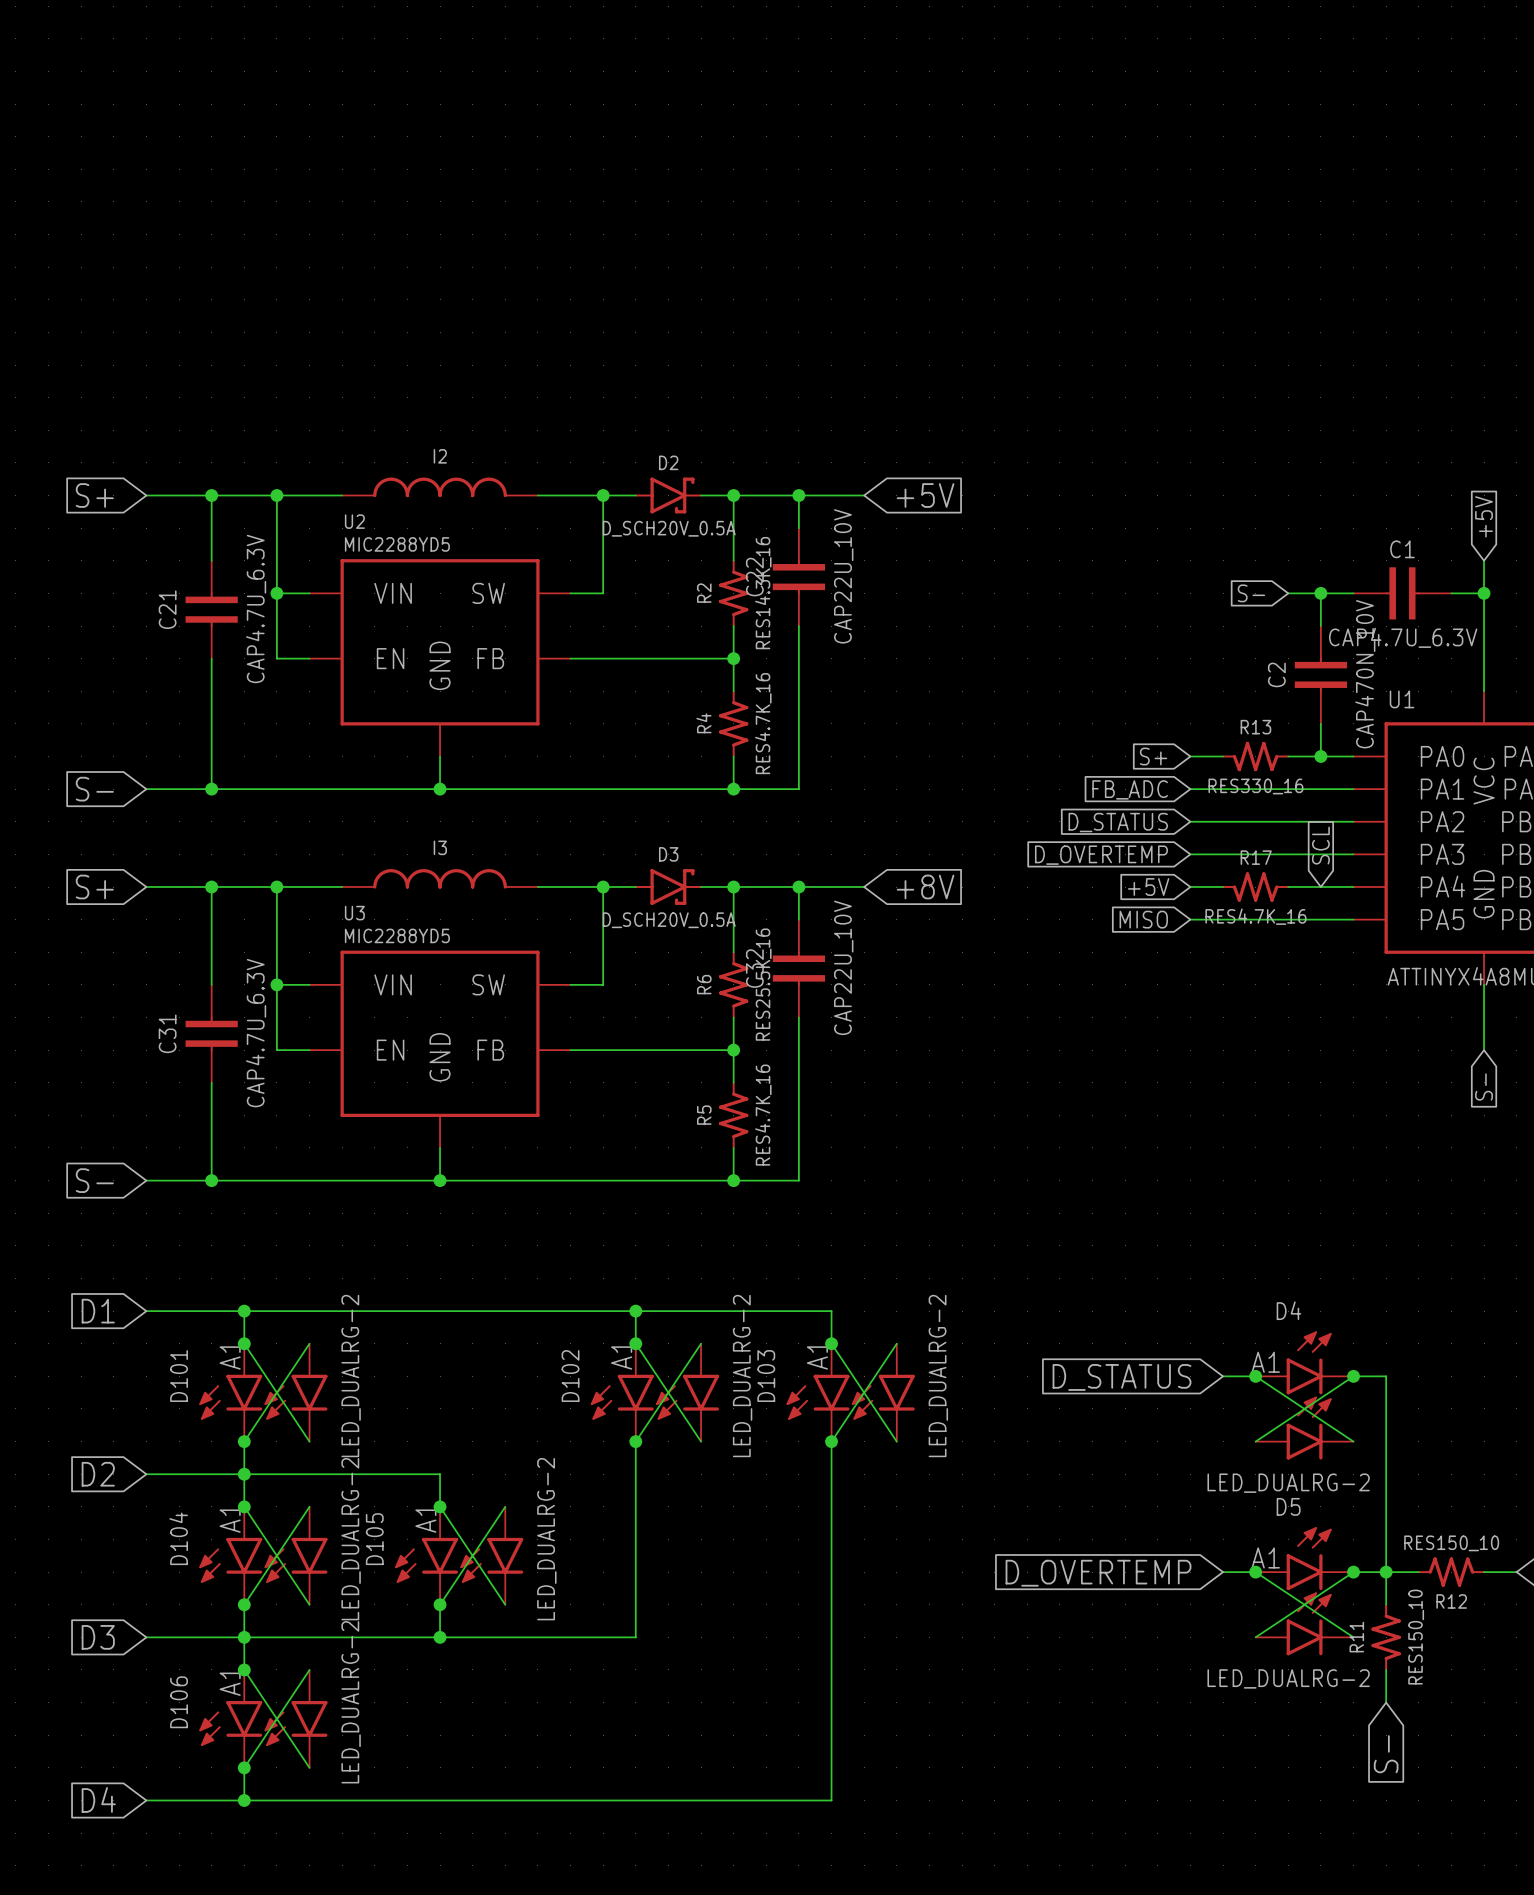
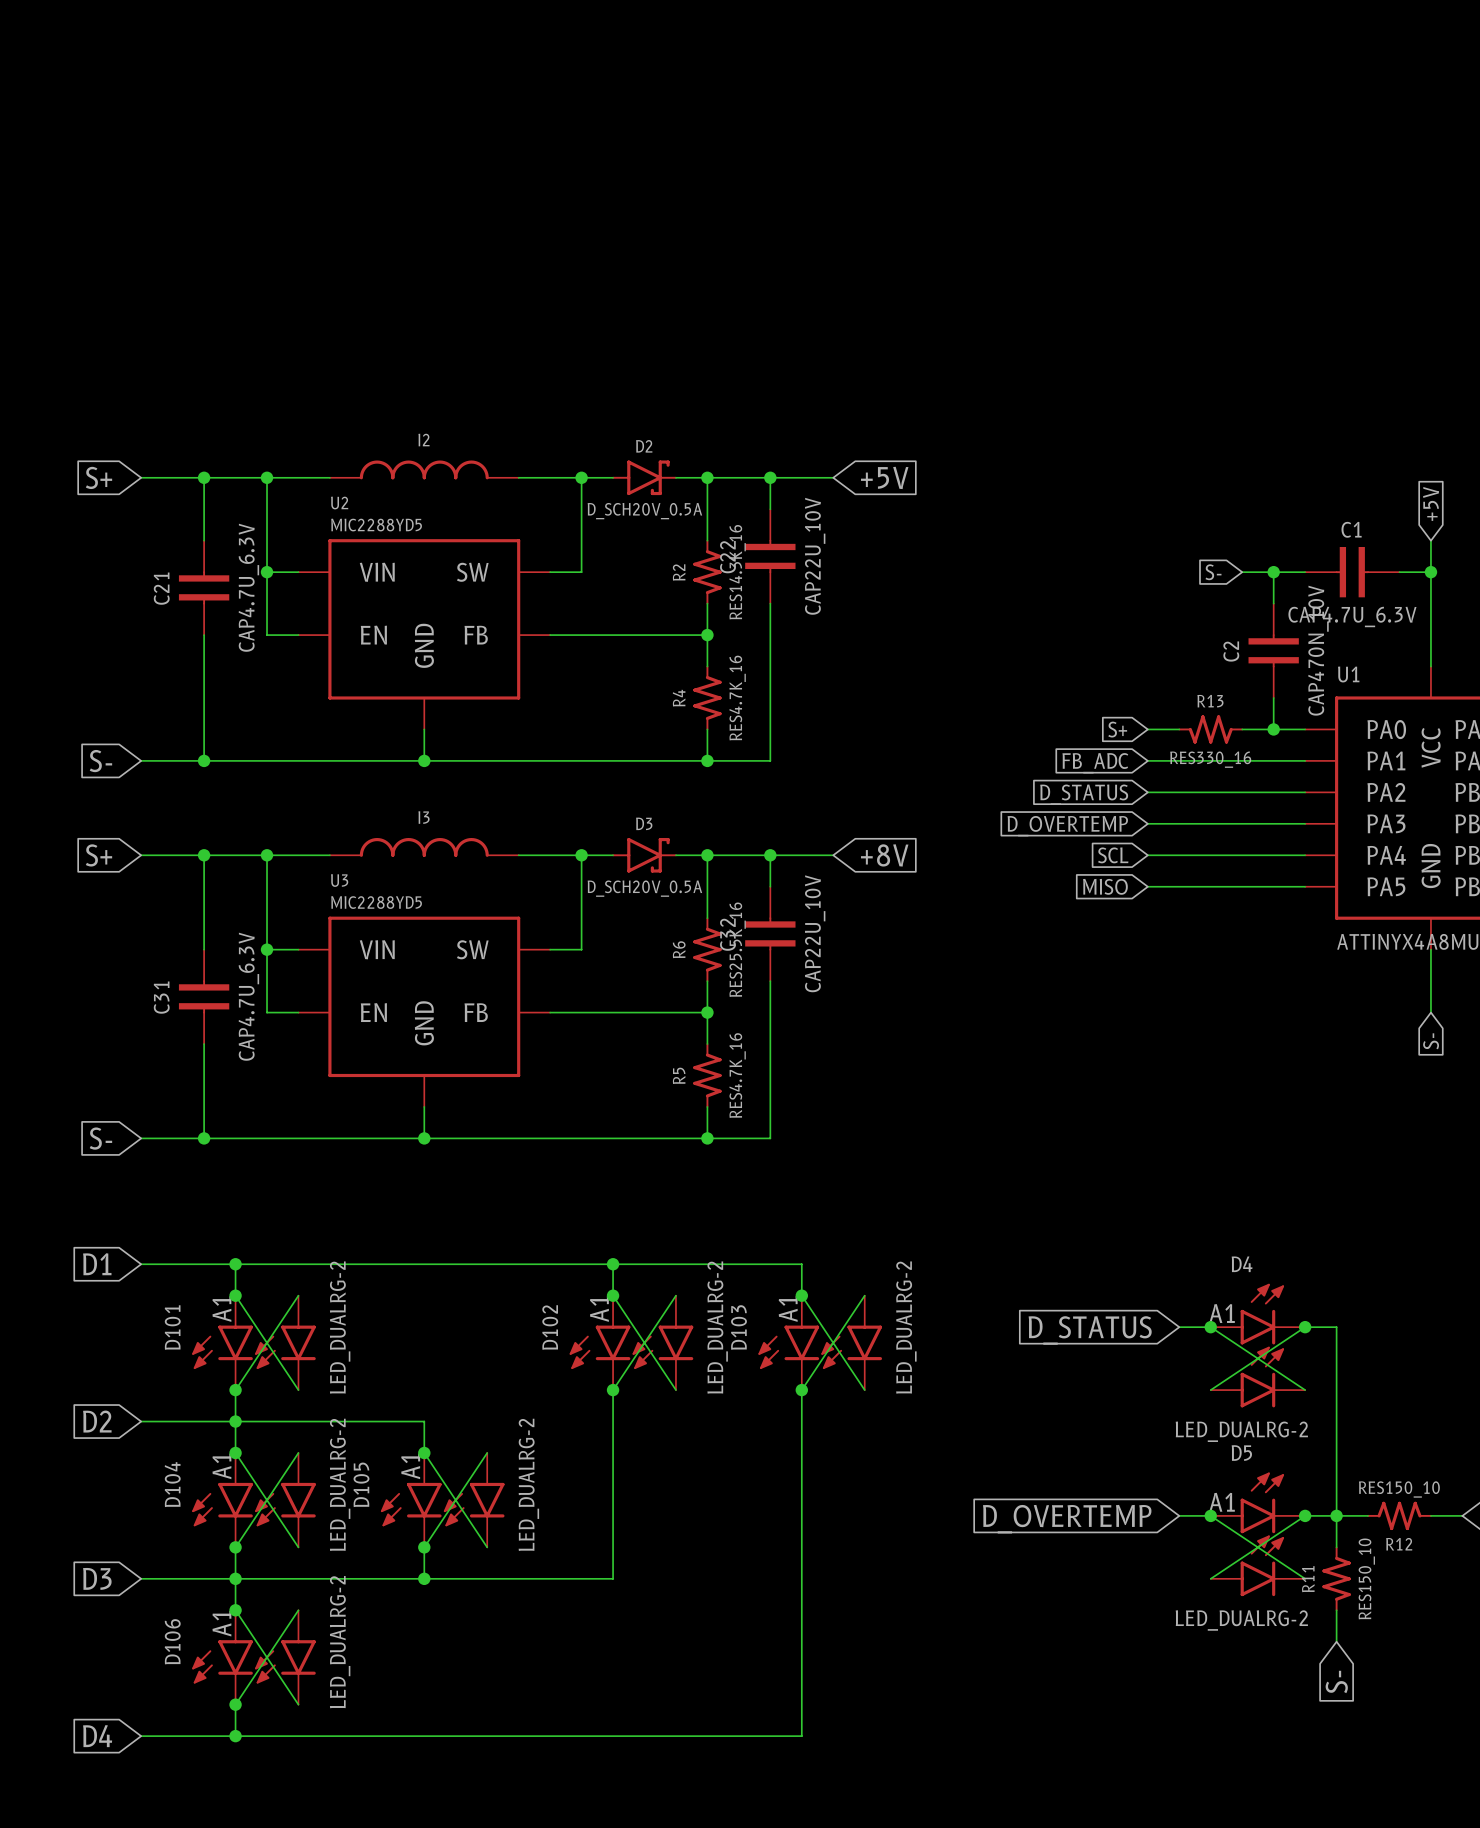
global label: SCL (1320, 845) -> none
global label: +5V (1148, 887) -> SCL (1113, 855)
R17: RES4.7K_16 (1255, 887) -> none

